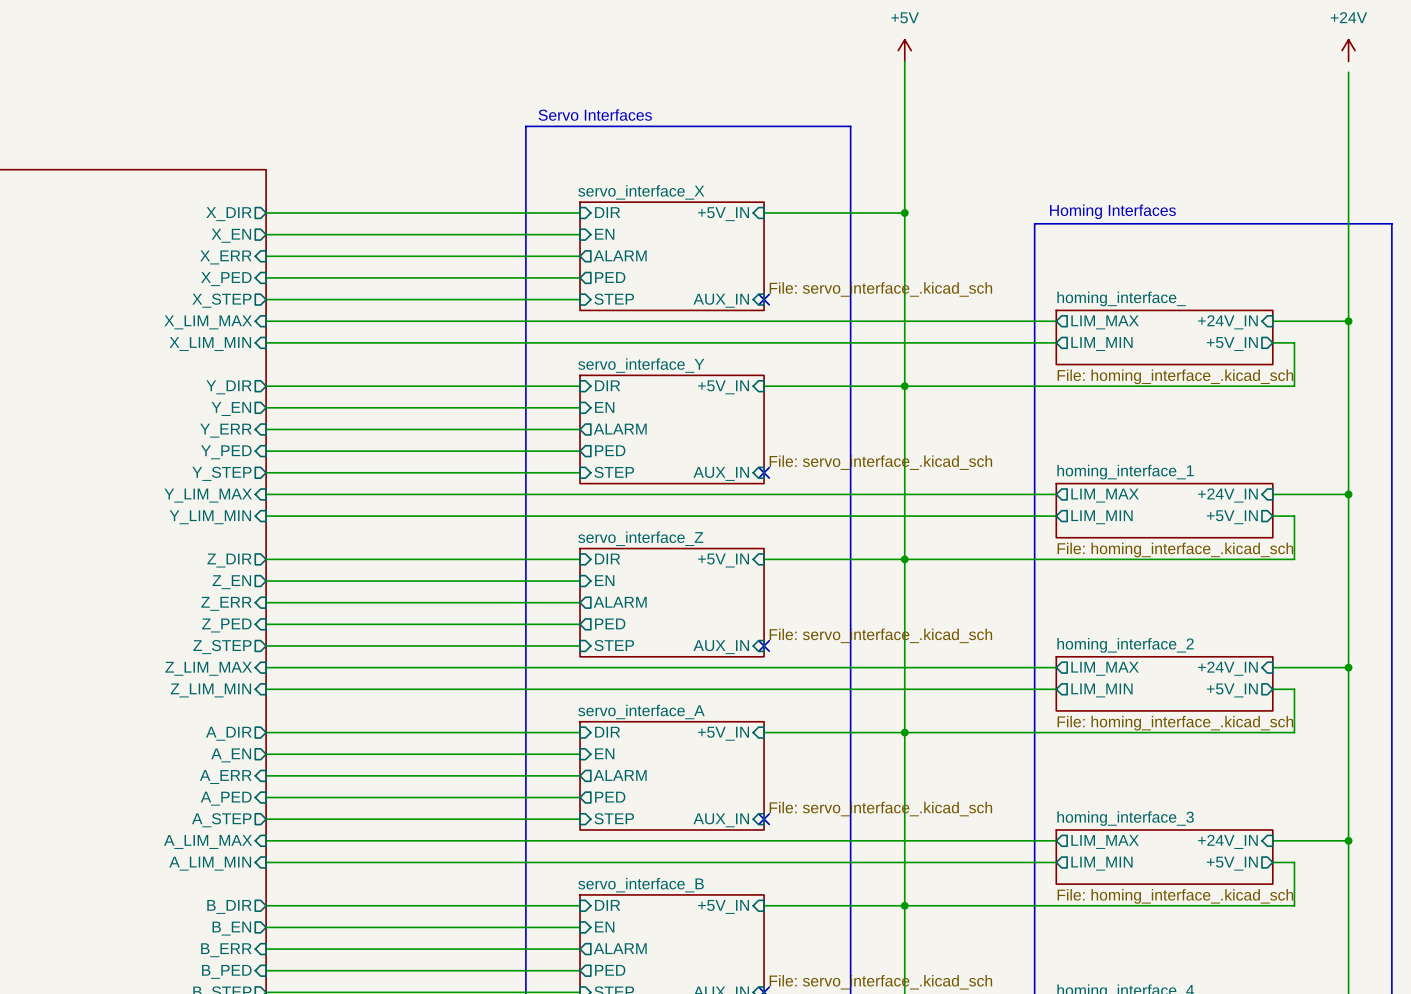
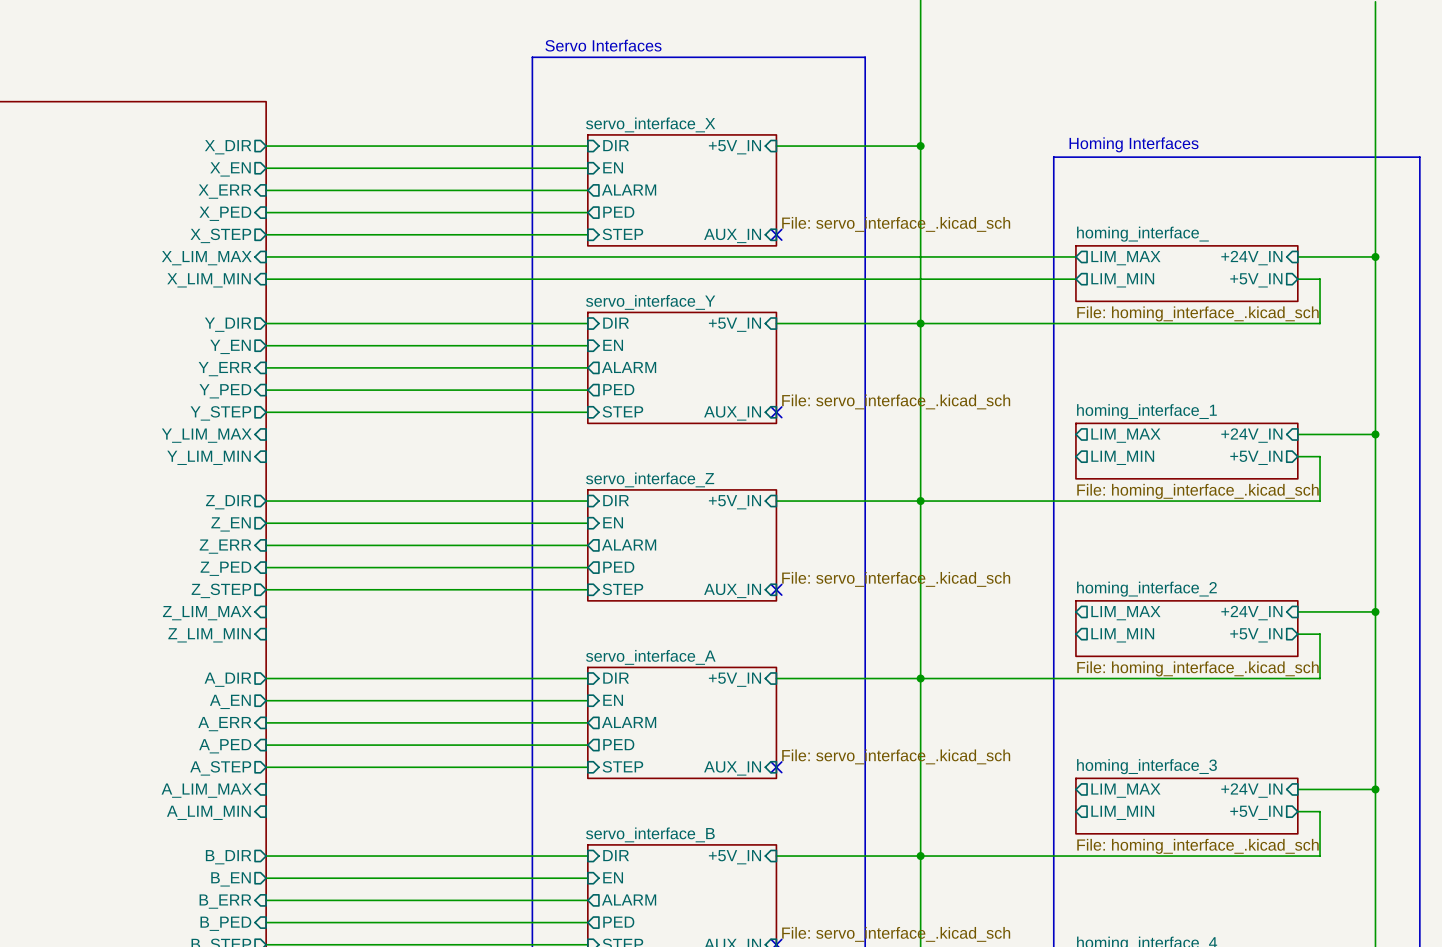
wire: (266, 494) (1056, 494) -> none
wire: (266, 516) (1056, 516) -> none
wire: (266, 667) (1056, 667) -> none
wire: (266, 689) (1056, 689) -> none
wire: (266, 840) (1056, 840) -> none
wire: (266, 862) (1056, 862) -> none

